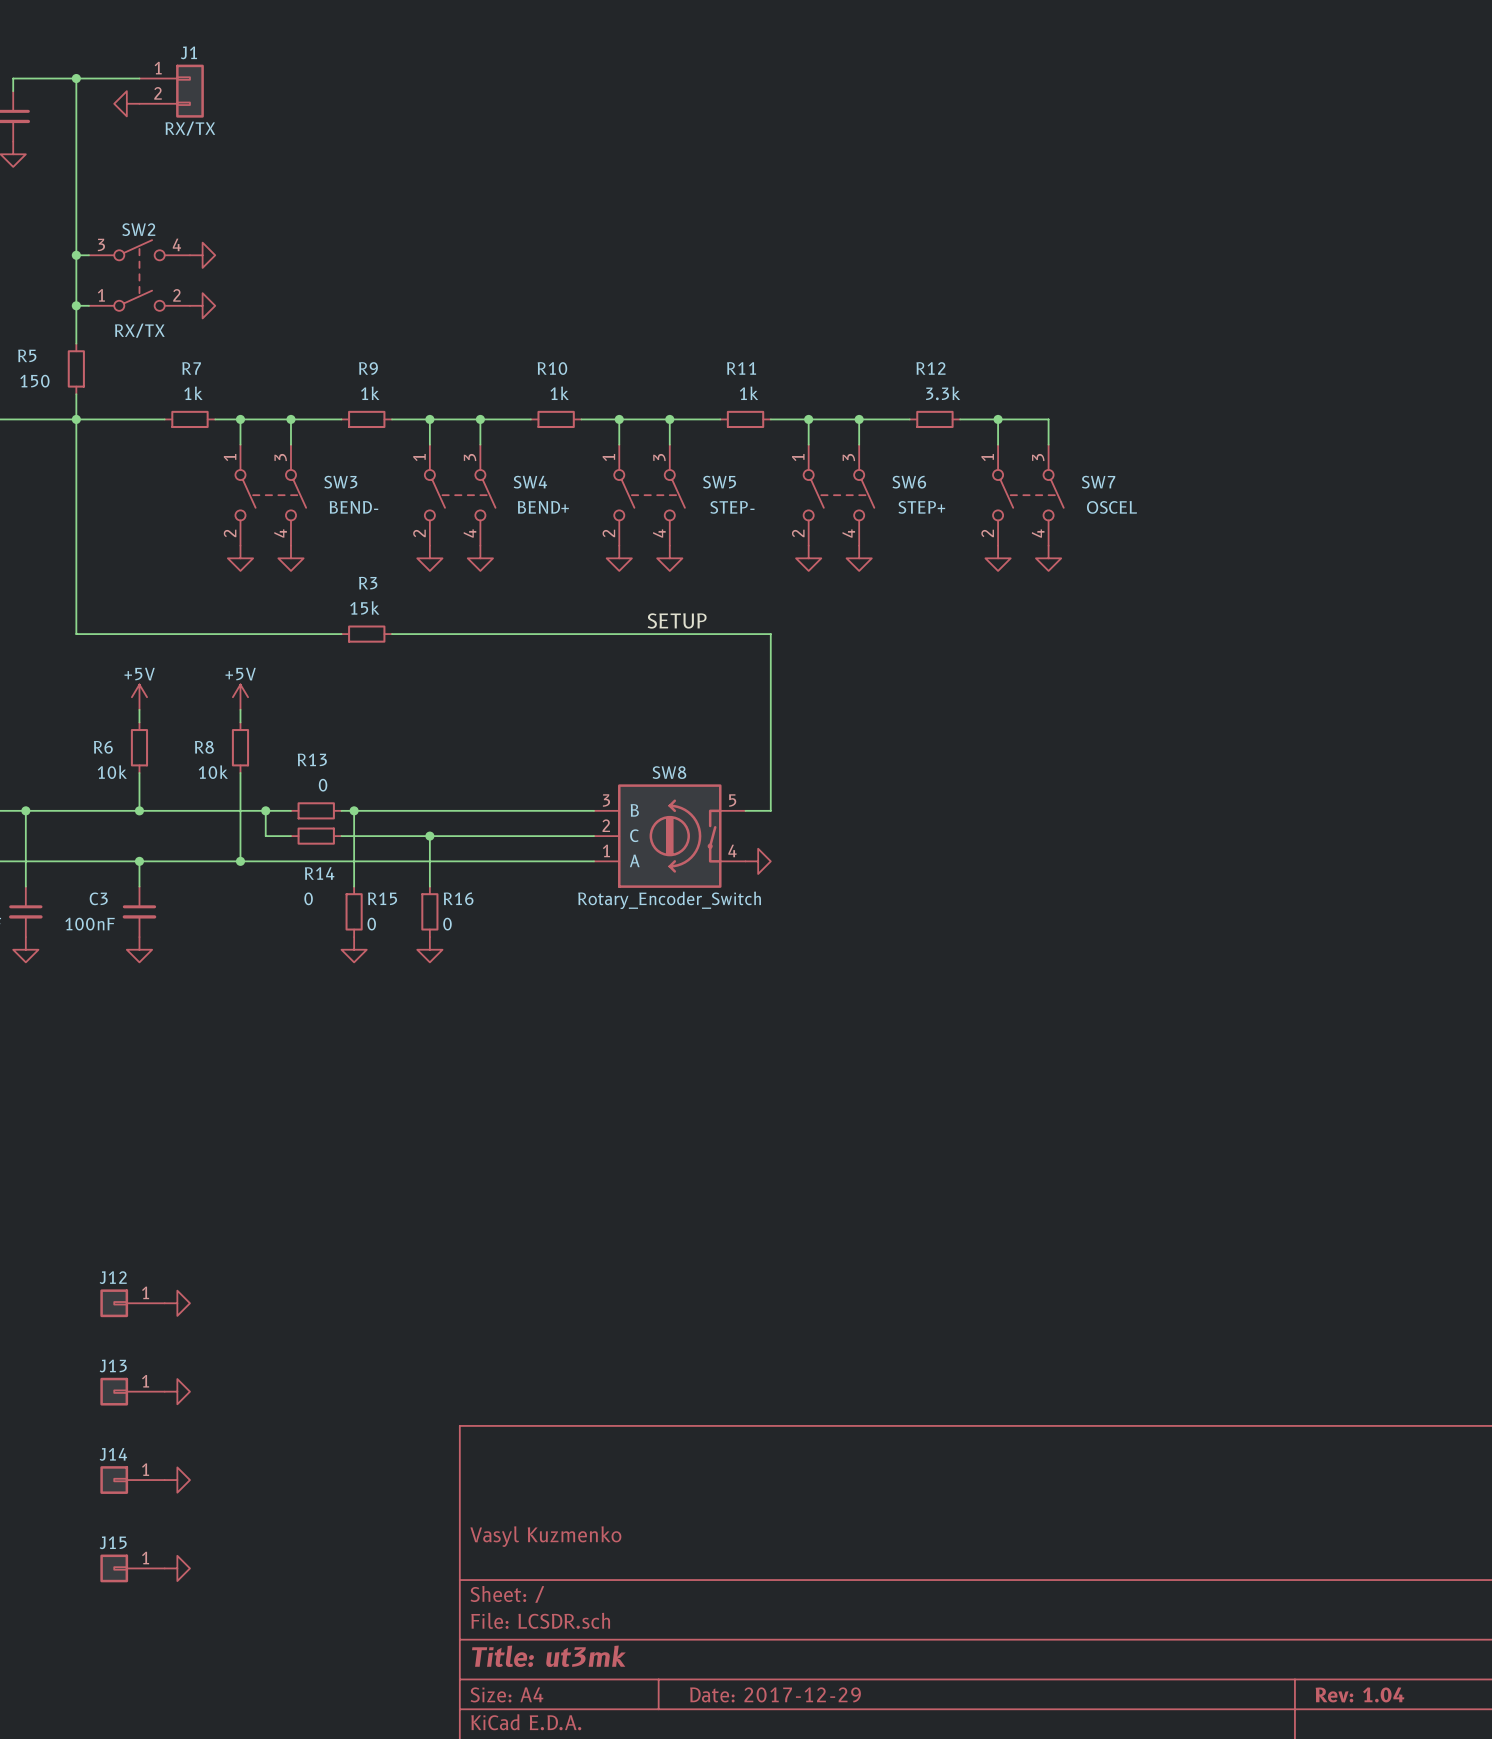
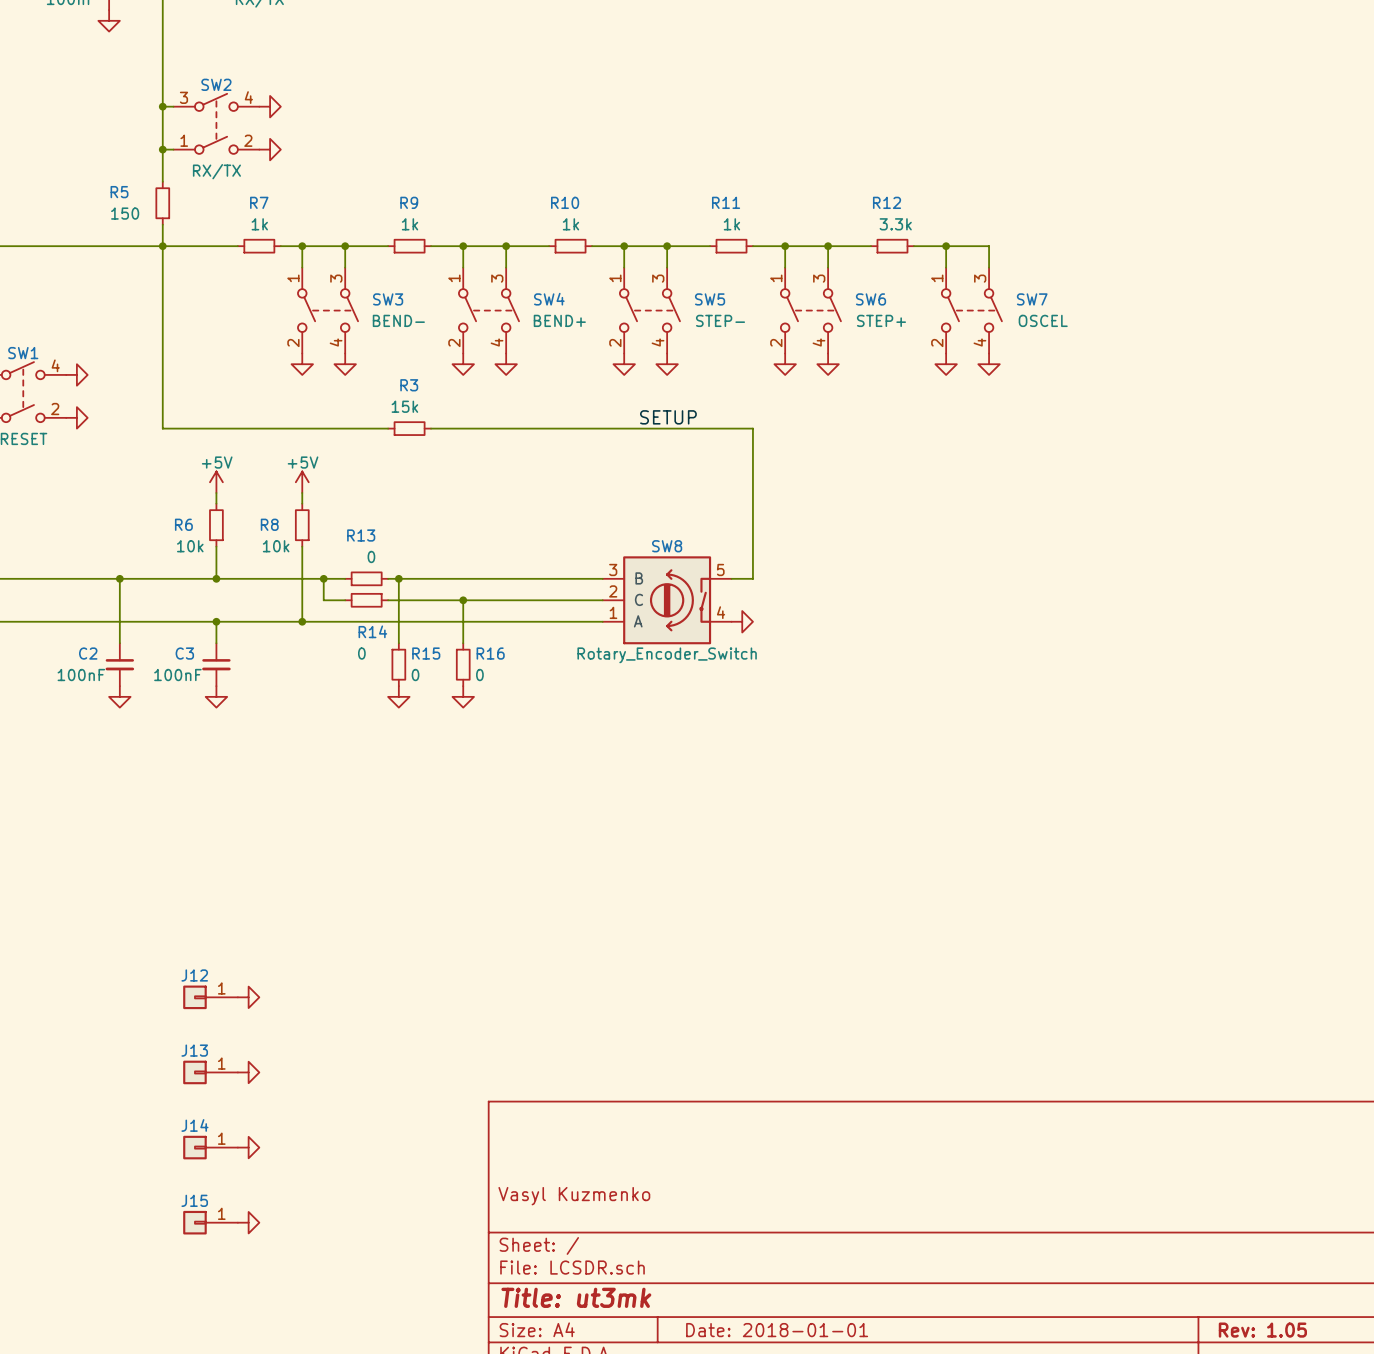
title block: Date: 2017-12-29 (775, 1694) -> Date: 2018-01-01 (777, 1330)
title block: Rev: 1.04 (1359, 1694) -> Rev: 1.05 (1262, 1330)

